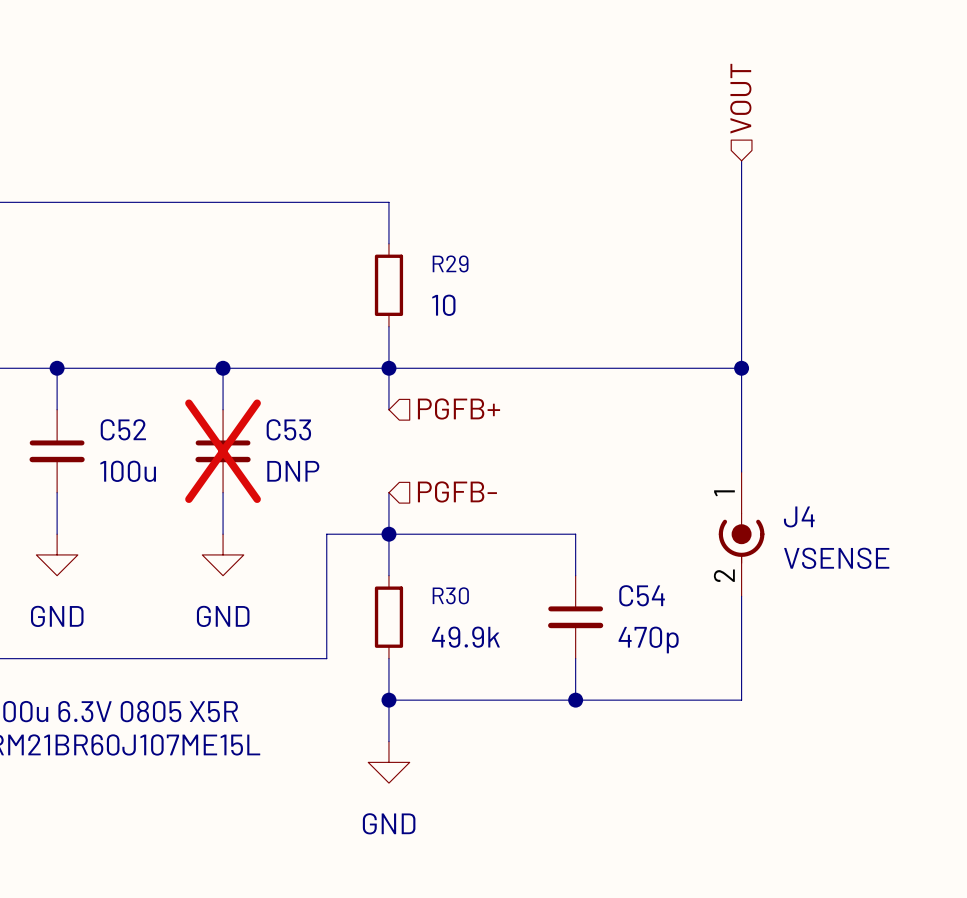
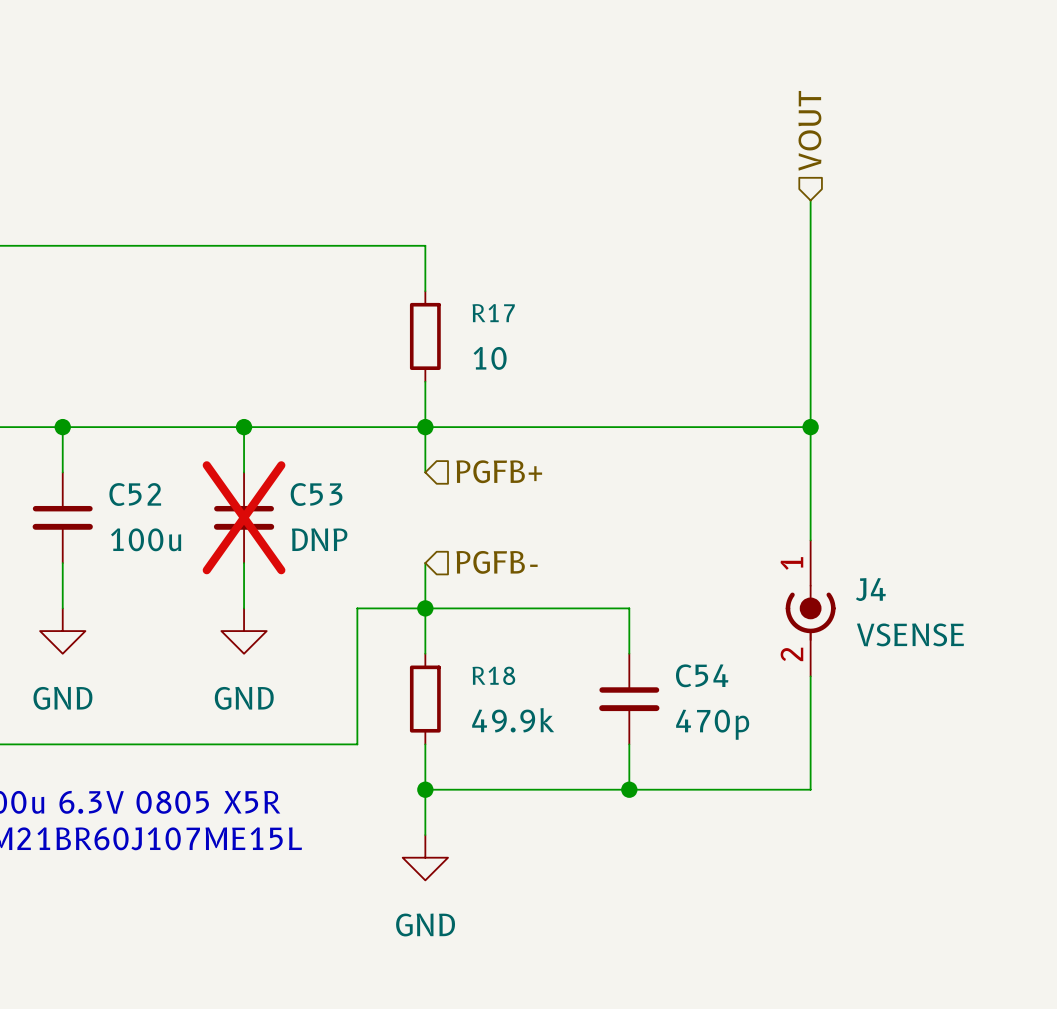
R29 name: R29 (450, 263) -> R17 (493, 313)
R30 name: R30 (450, 595) -> R18 (493, 675)

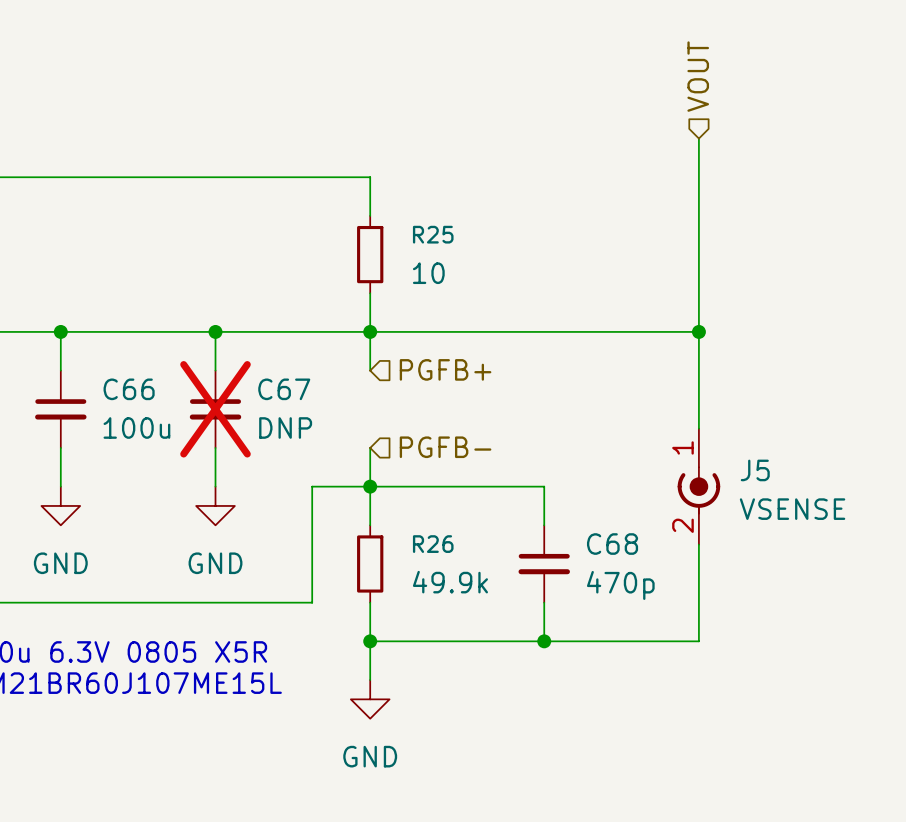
R17 name: R17 (493, 313) -> R25 (433, 234)
C52 name: C52 (135, 494) -> C66 (129, 389)
C53 name: C53 (316, 494) -> C67 (284, 389)
J4 name: J4 (870, 589) -> J5 (755, 470)
R18 name: R18 (493, 675) -> R26 (433, 544)
C54 name: C54 (702, 675) -> C68 (612, 544)

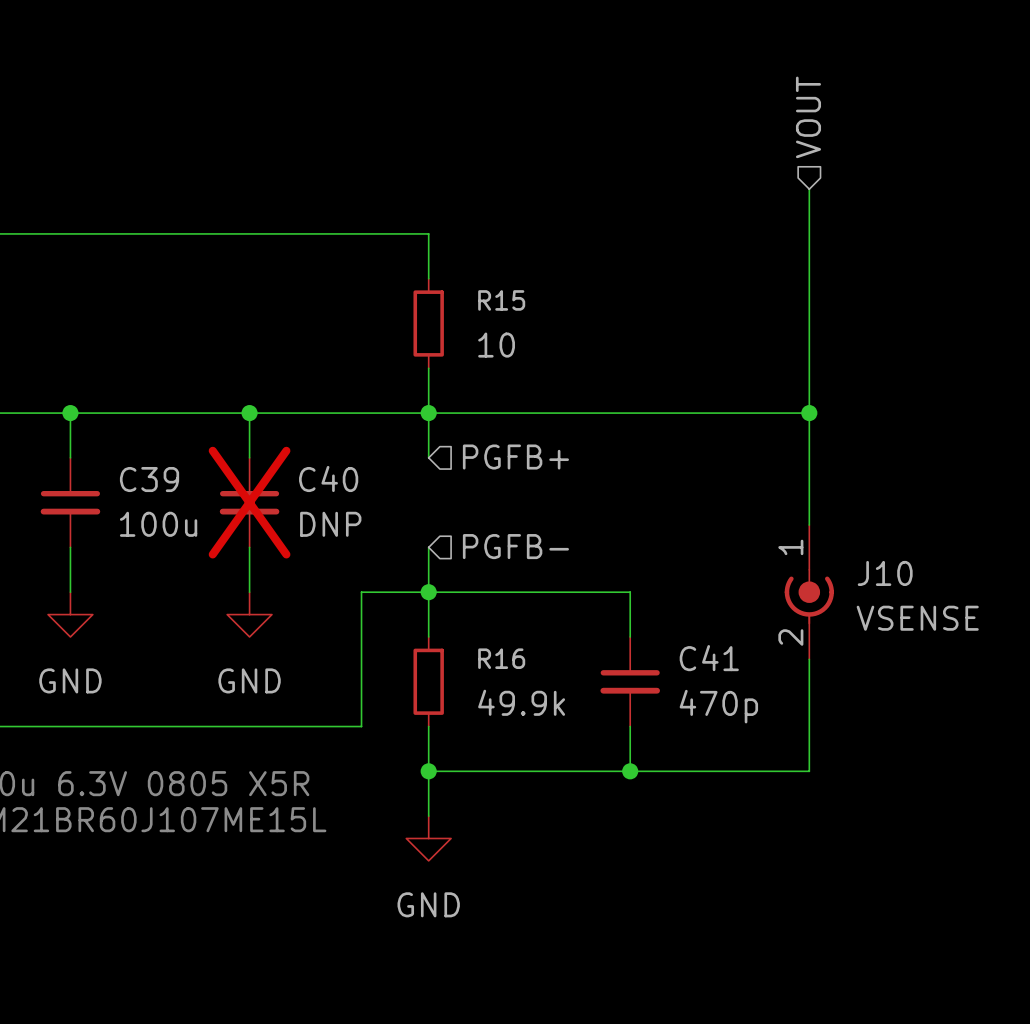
R25 name: R25 (433, 234) -> R15 (501, 300)
C66 name: C66 (129, 389) -> C39 (149, 479)
C67 name: C67 (284, 389) -> C40 (328, 478)
J5 name: J5 (755, 470) -> J10 (885, 573)
R26 name: R26 (433, 544) -> R16 (501, 658)
C68 name: C68 (612, 544) -> C41 (709, 658)

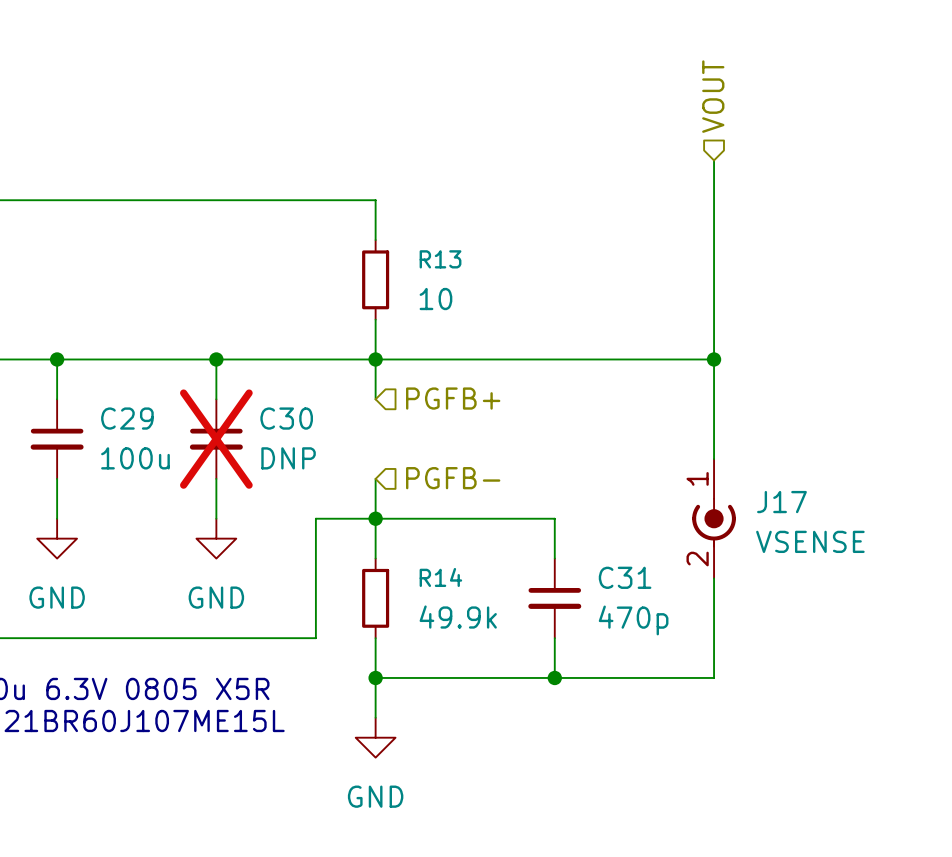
R15 name: R15 (501, 300) -> R13 (440, 259)
C40 name: C40 (328, 478) -> C30 (286, 418)
C39 name: C39 (149, 479) -> C29 (127, 418)
J10 name: J10 (885, 573) -> J17 (781, 502)
R16 name: R16 (501, 658) -> R14 (440, 577)
C41 name: C41 (709, 658) -> C31 (625, 577)

